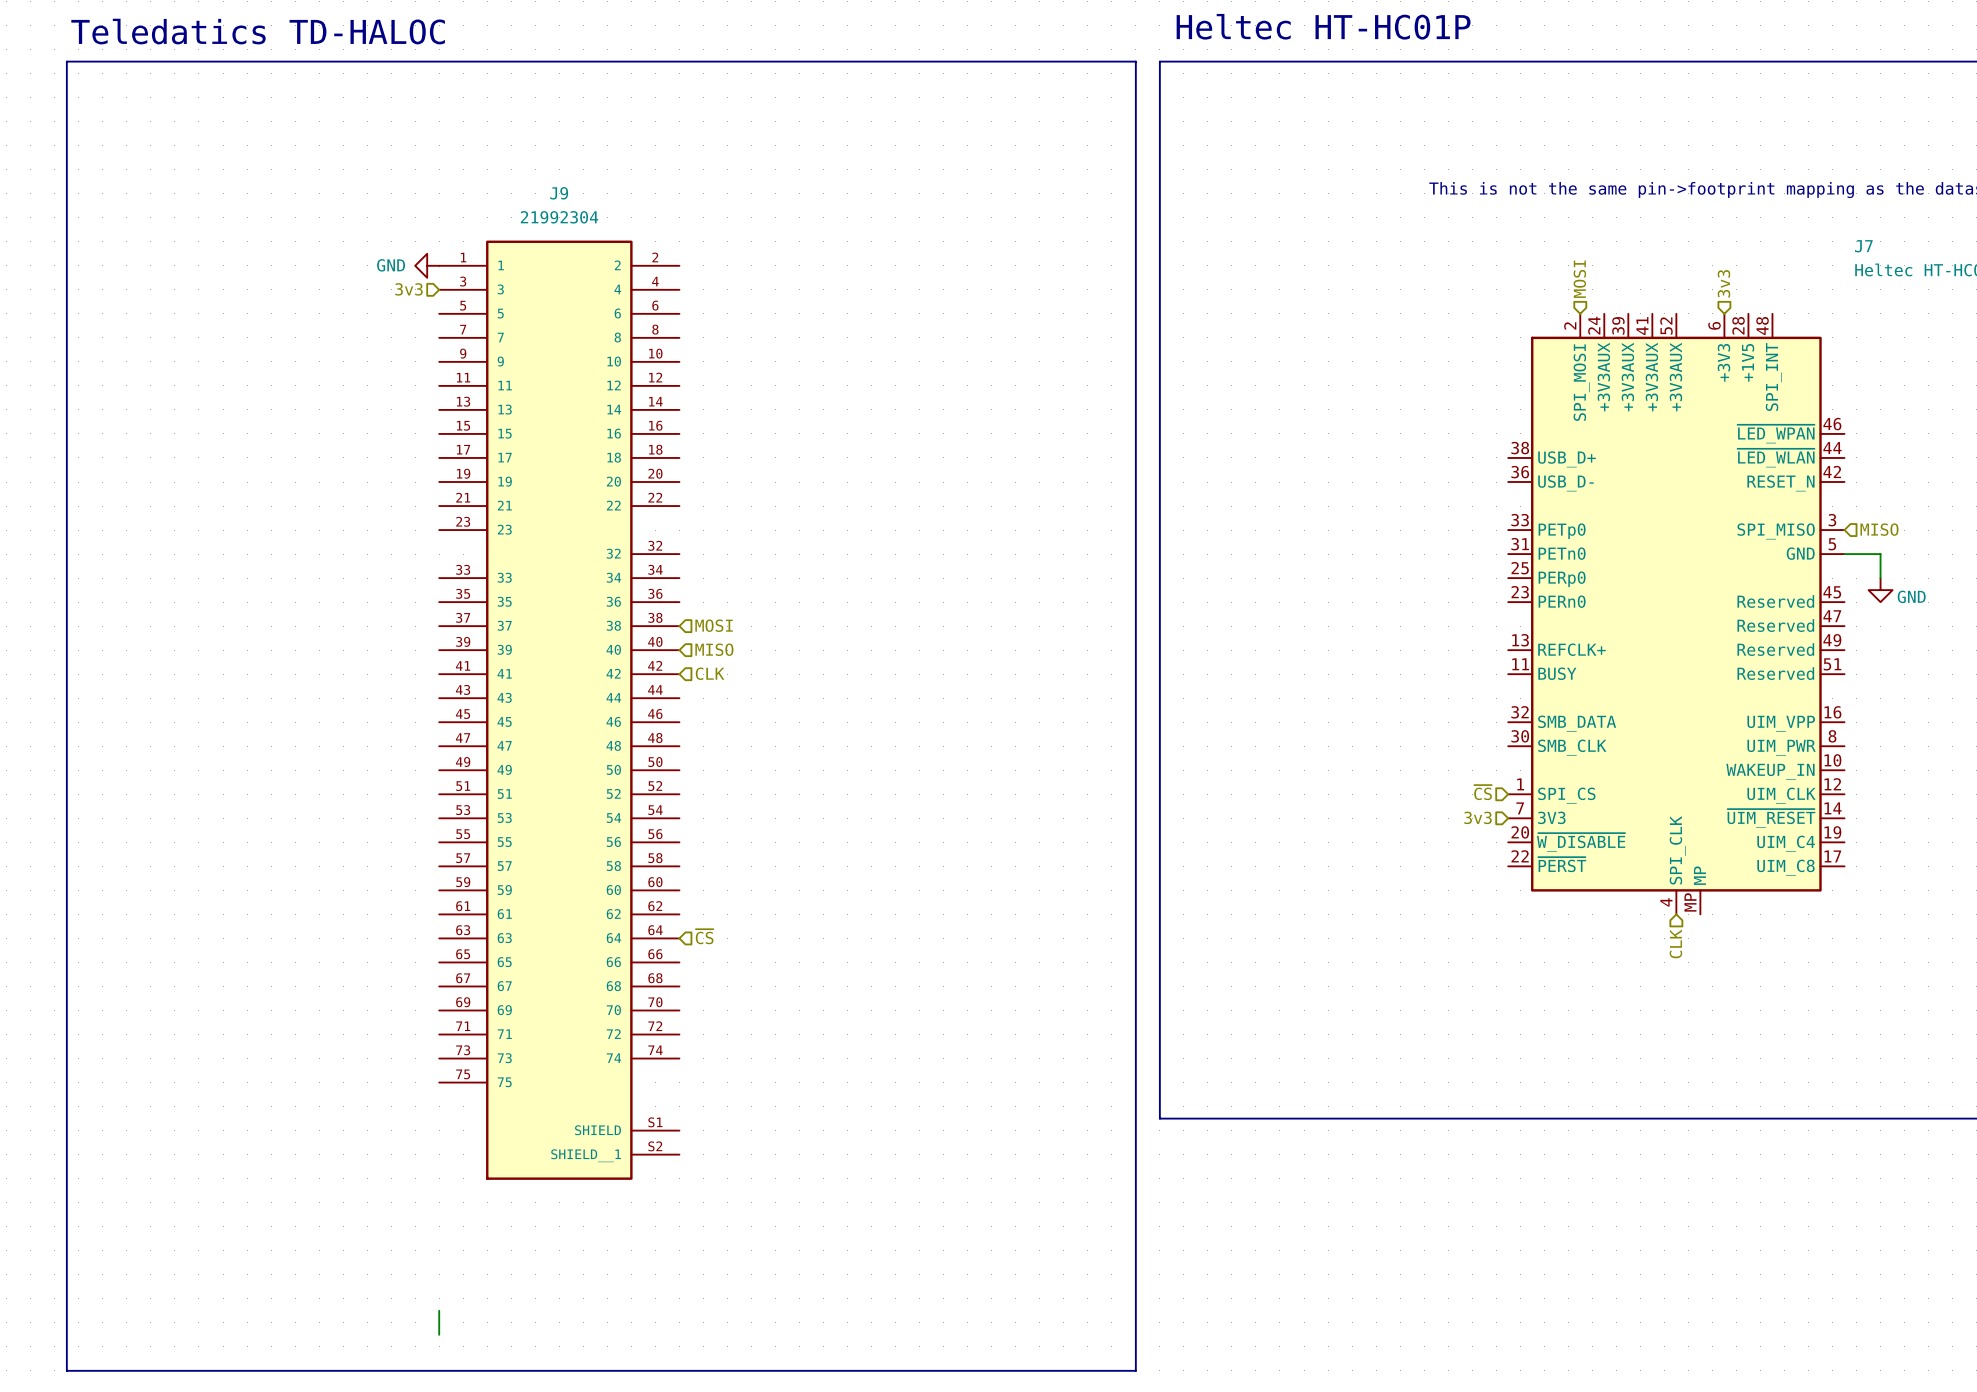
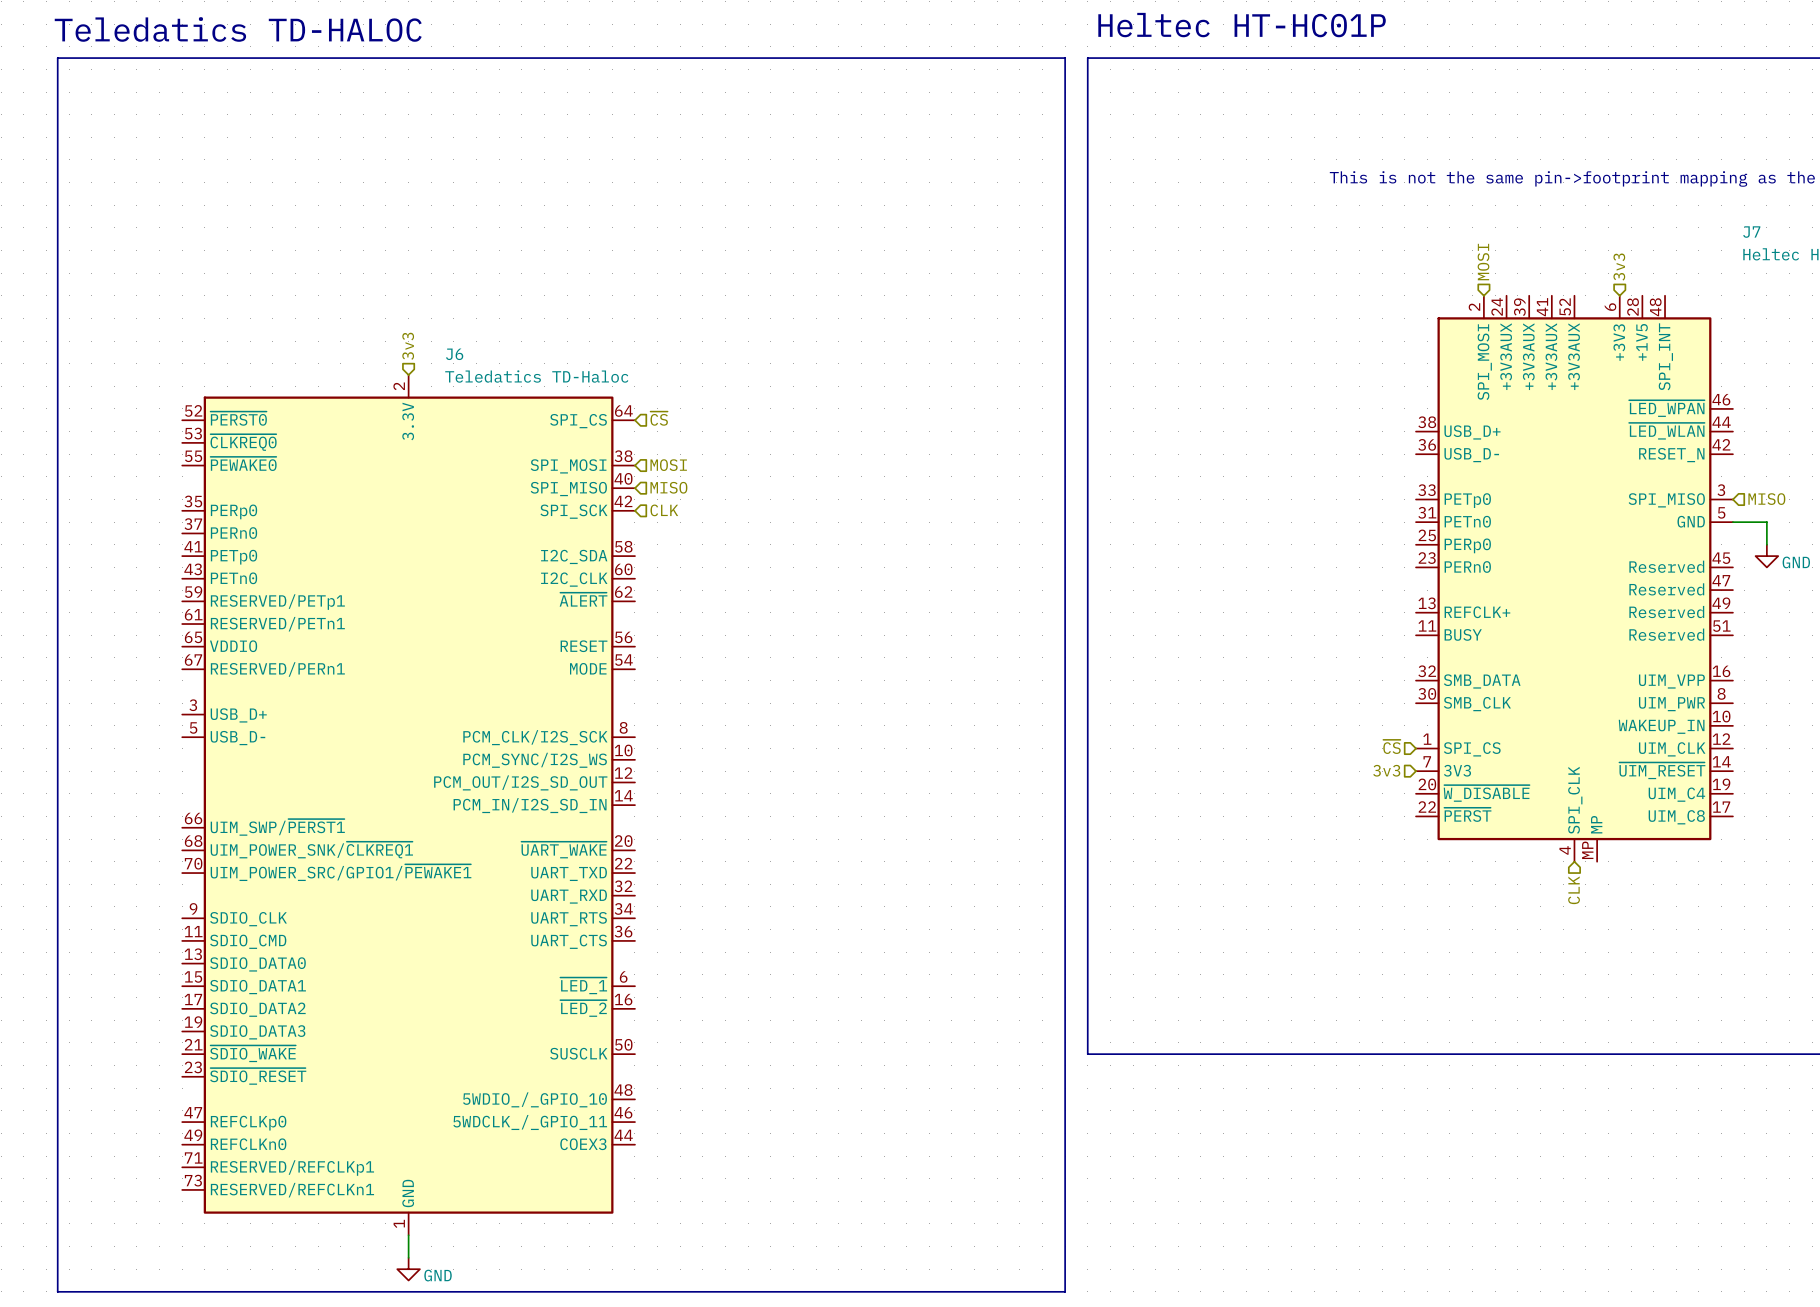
power symbol: GND (427, 265) -> none
hierarchical label rotation: 0° (409, 289) -> 90° clockwise (408, 346)
hierarchical label position: 3v3 (409, 289) -> 3v3 (408, 346)
hierarchical label: none -> ~{CS} (659, 418)
hierarchical label position: MOSI (714, 625) -> MOSI (668, 465)
hierarchical label position: MISO (714, 649) -> MISO (668, 487)
hierarchical label position: CLK (710, 673) -> CLK (664, 510)
J9: 21992304 (559, 710) -> none
J6: none -> Teledatics TD-Haloc (408, 805)
hierarchical label: ~{CS} (704, 936) -> none
power symbol: none -> GND (408, 1269)

